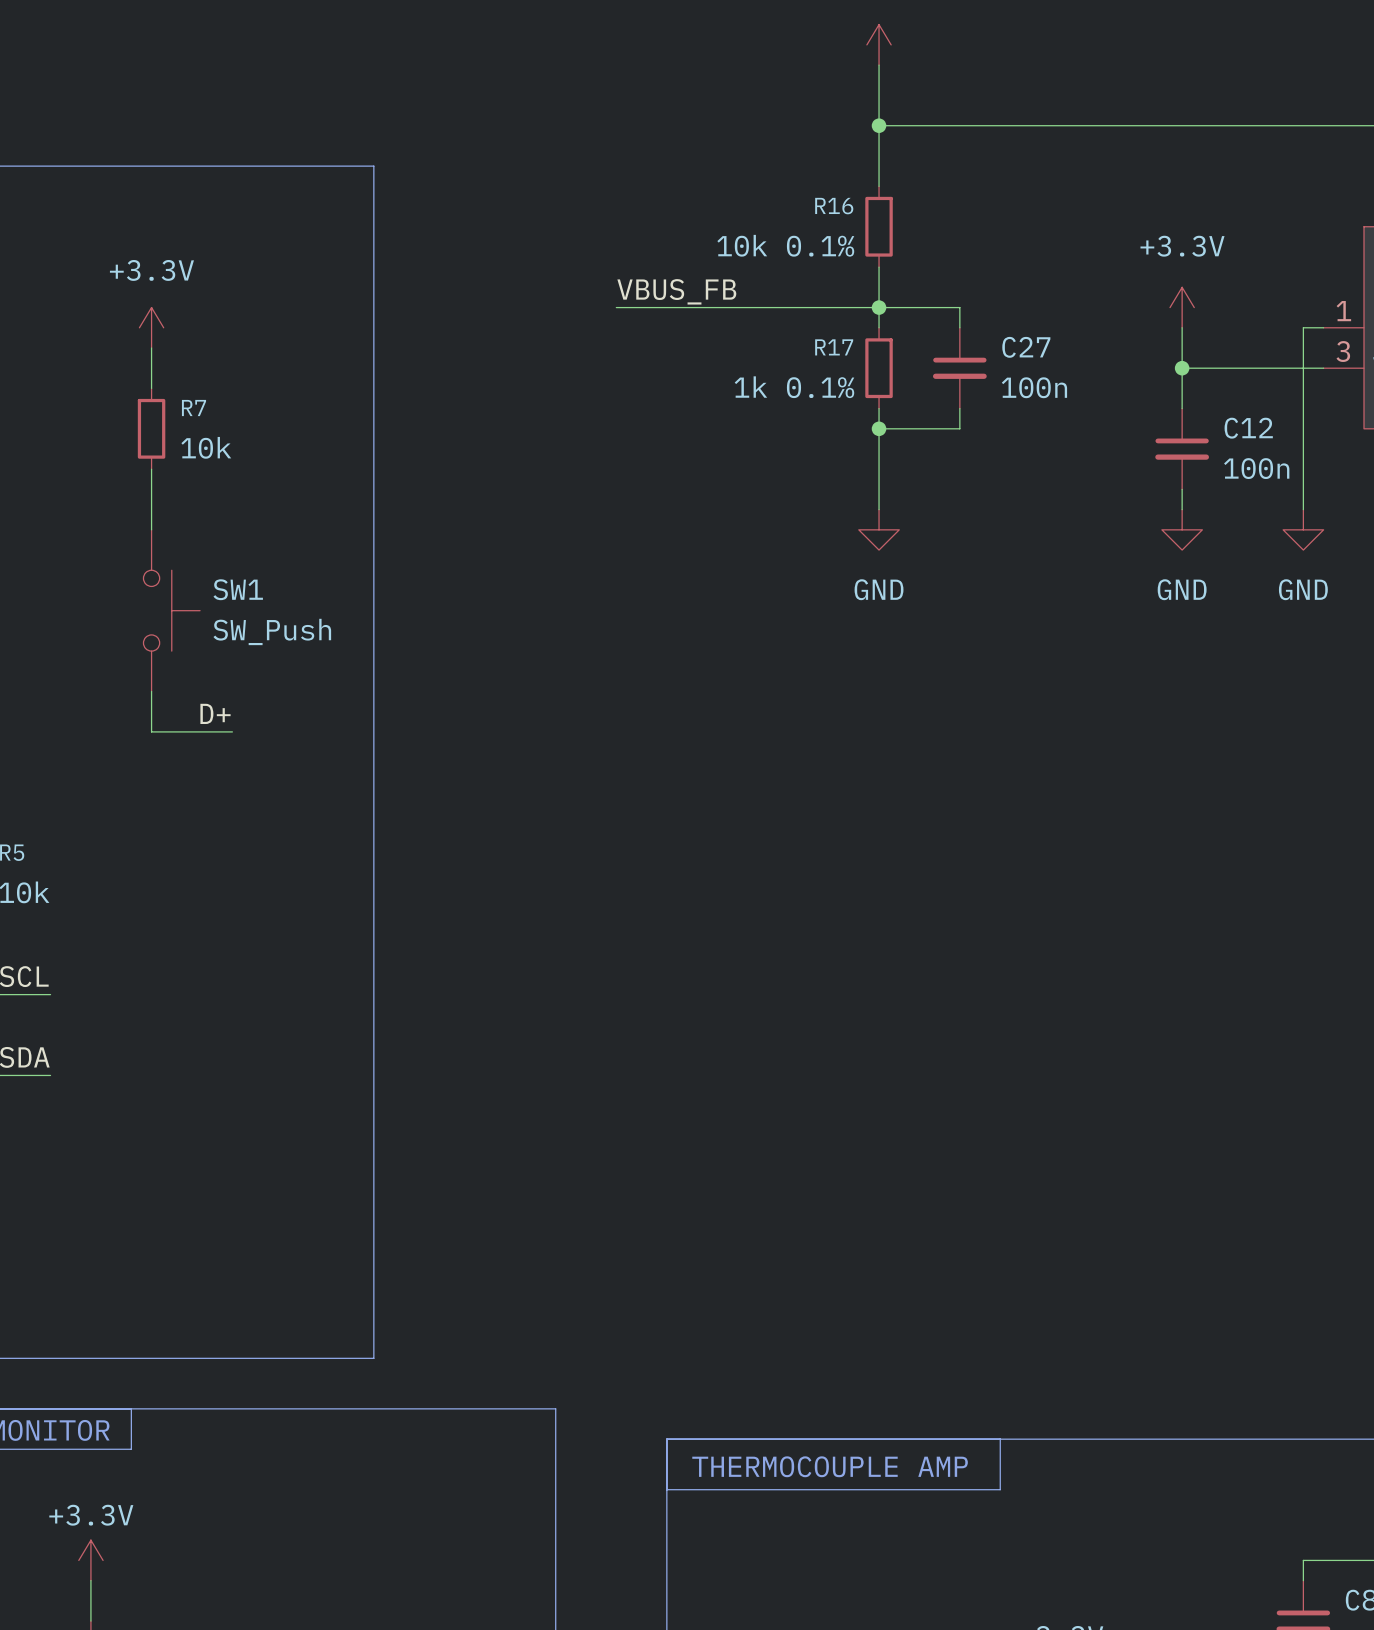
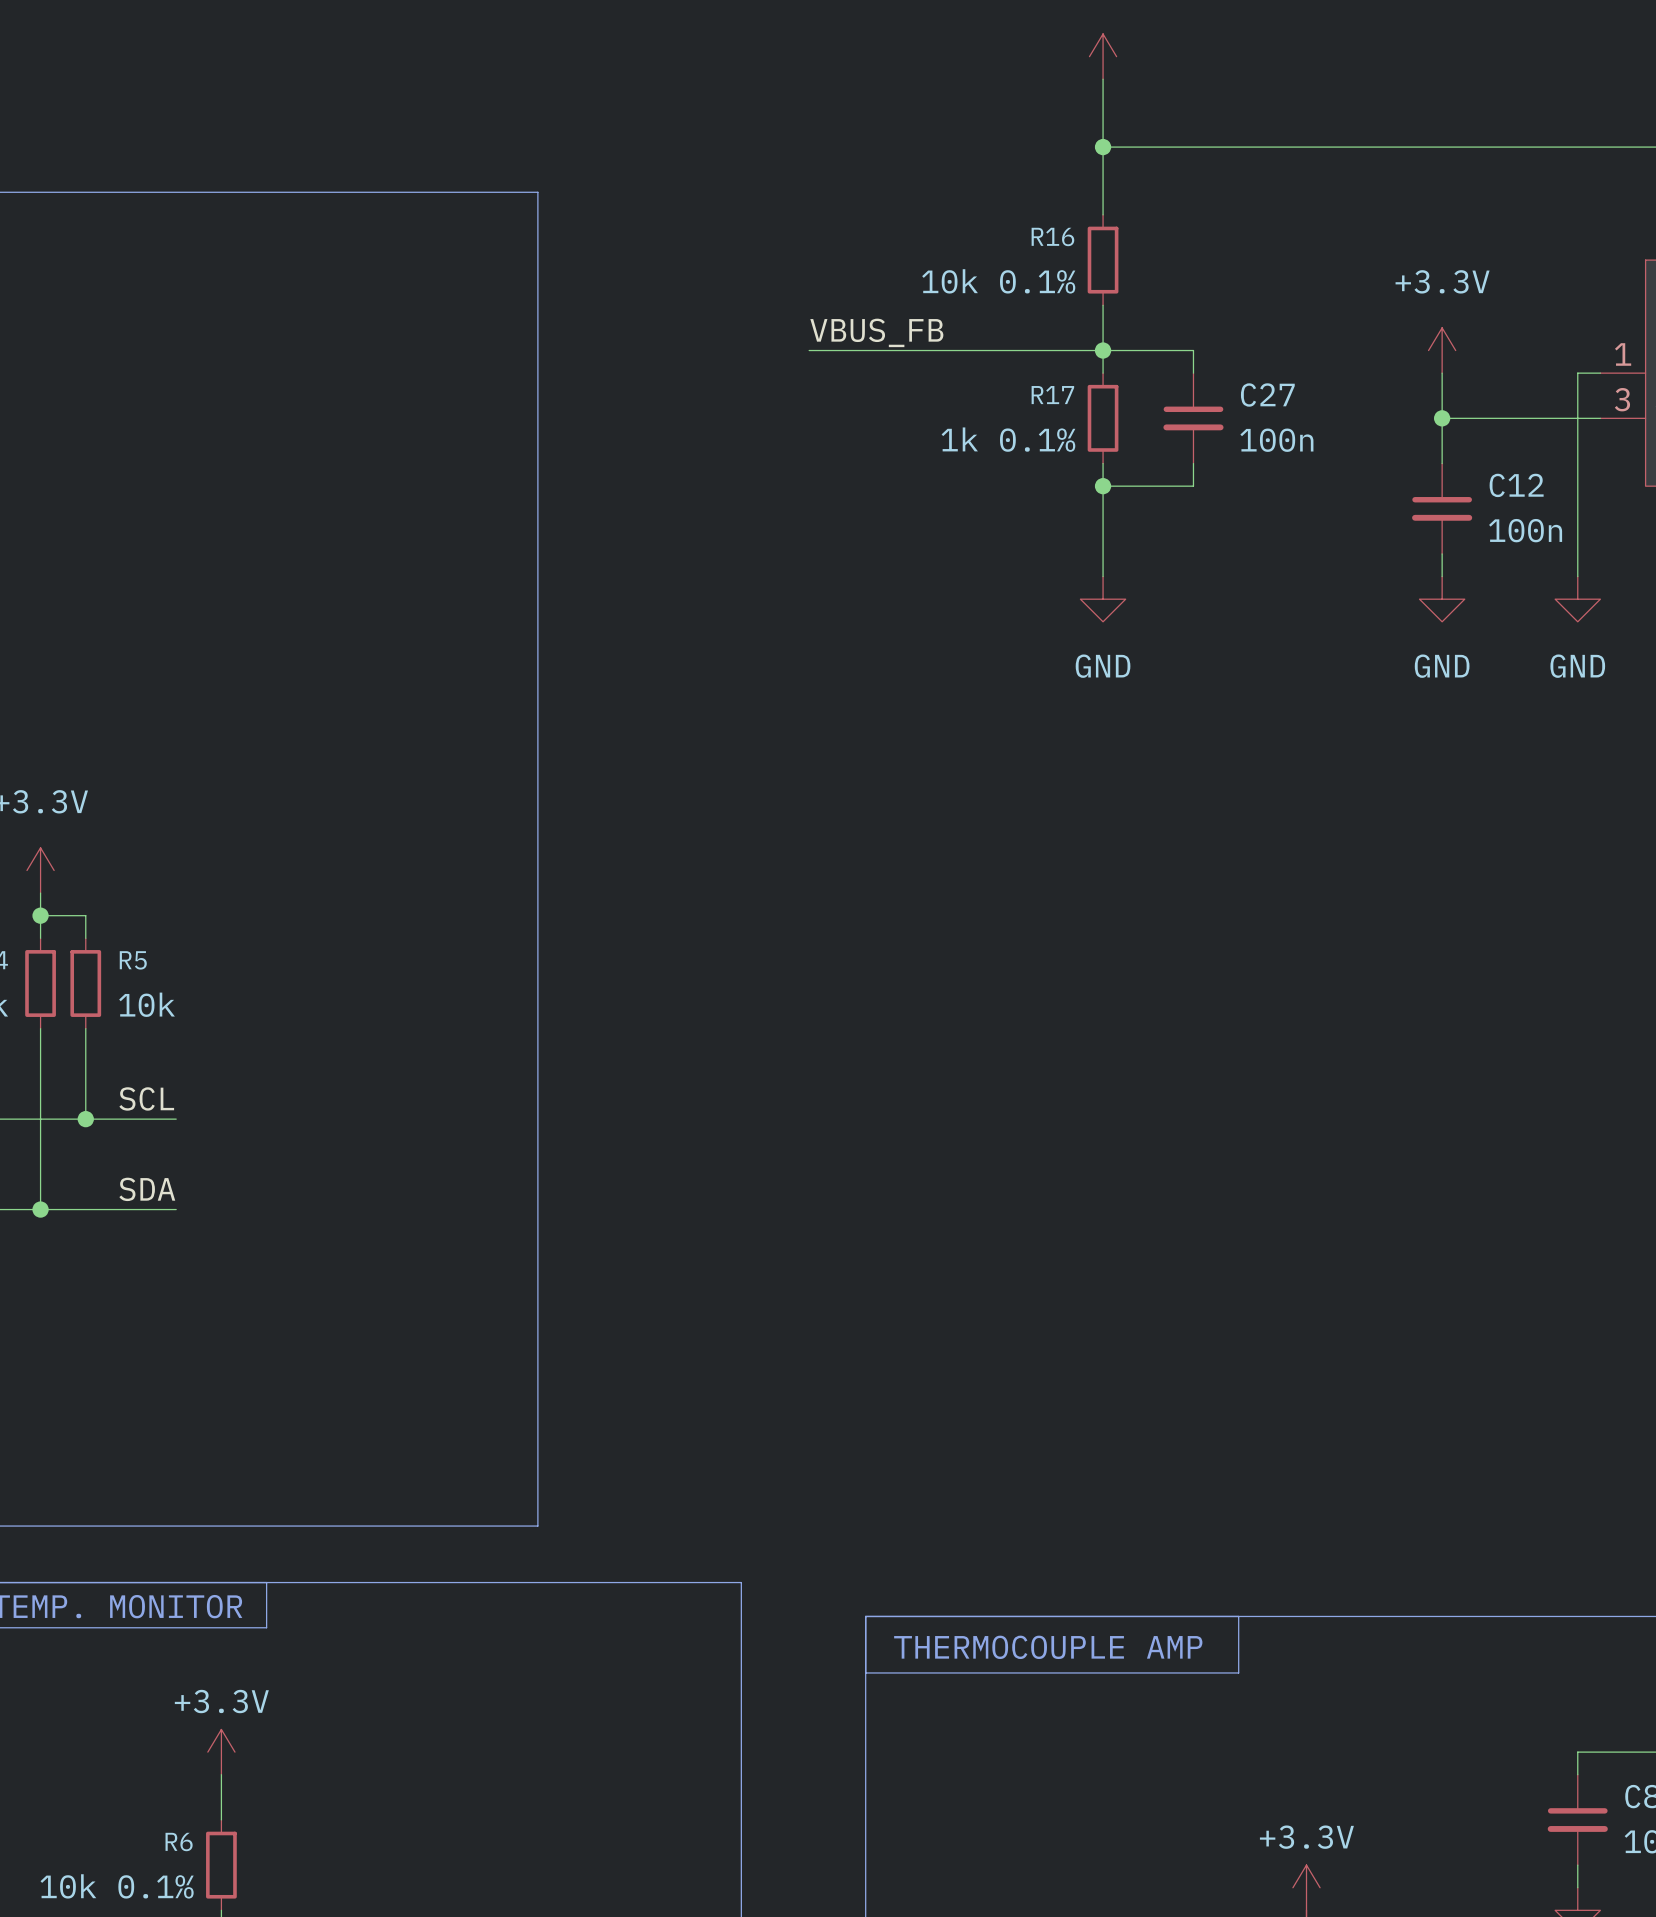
power symbol: +3.3V (151, 327) -> none
wire: (151, 347) (151, 388) -> none
R7: 10k (151, 428) -> none
wire: (151, 469) (151, 529) -> none
SW1: SW_Push (171, 610) -> none
wire: (151, 691) (151, 731) (232, 731) -> none
label: D+ (215, 713) -> none

